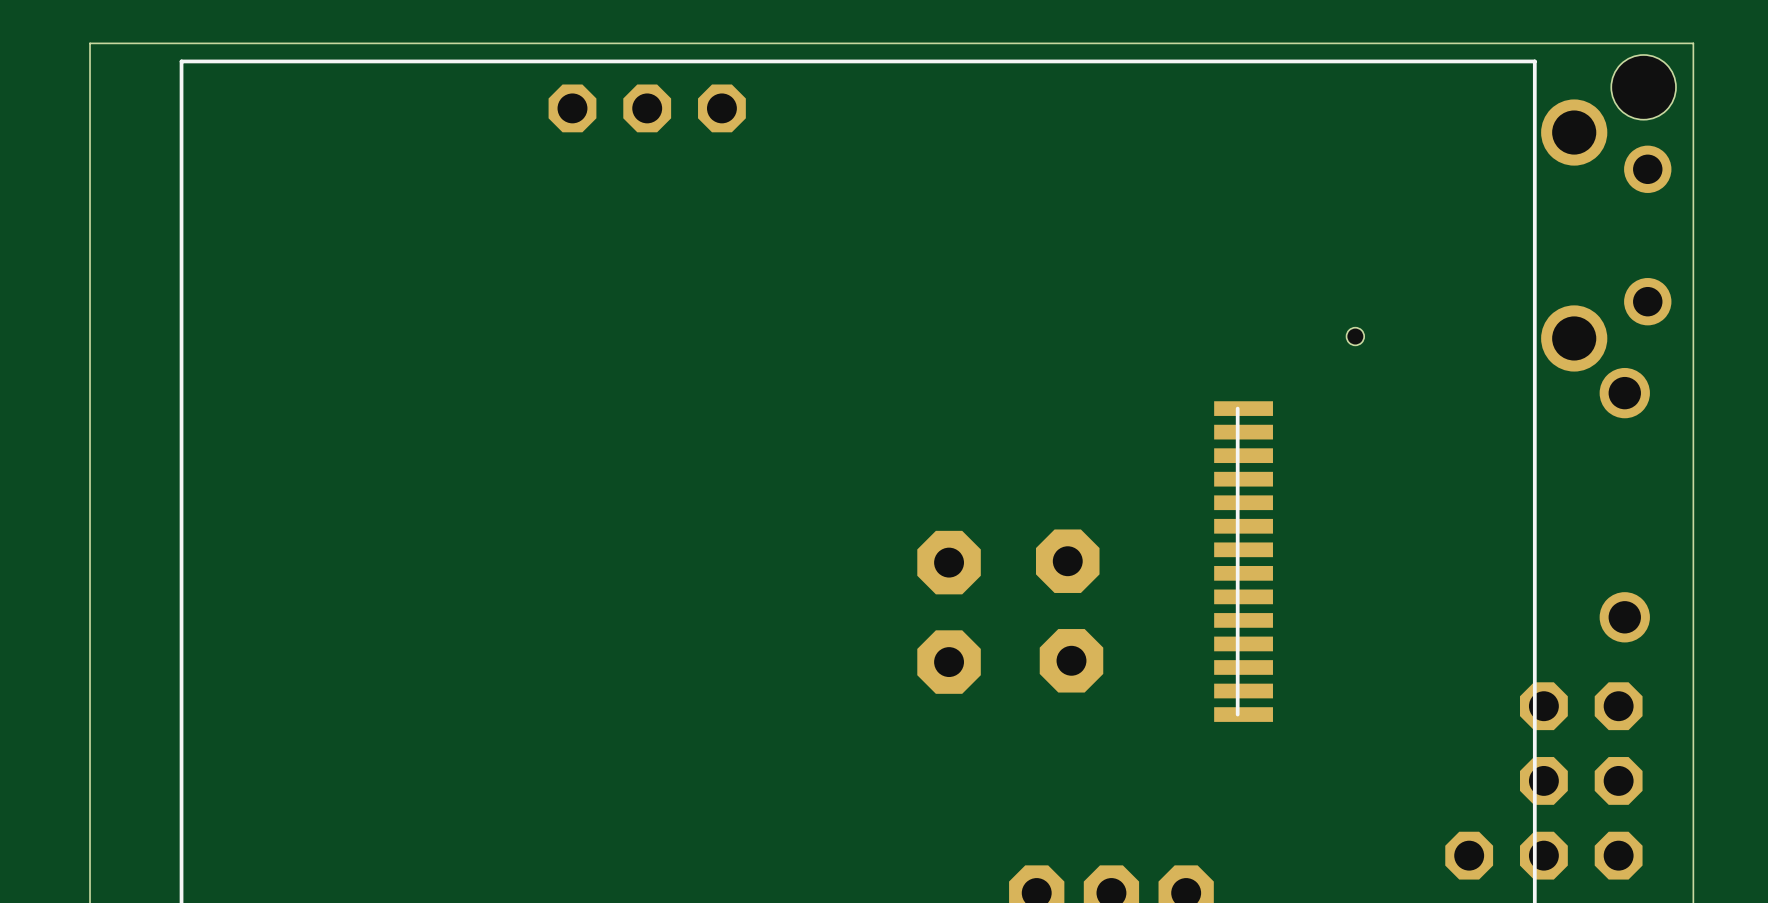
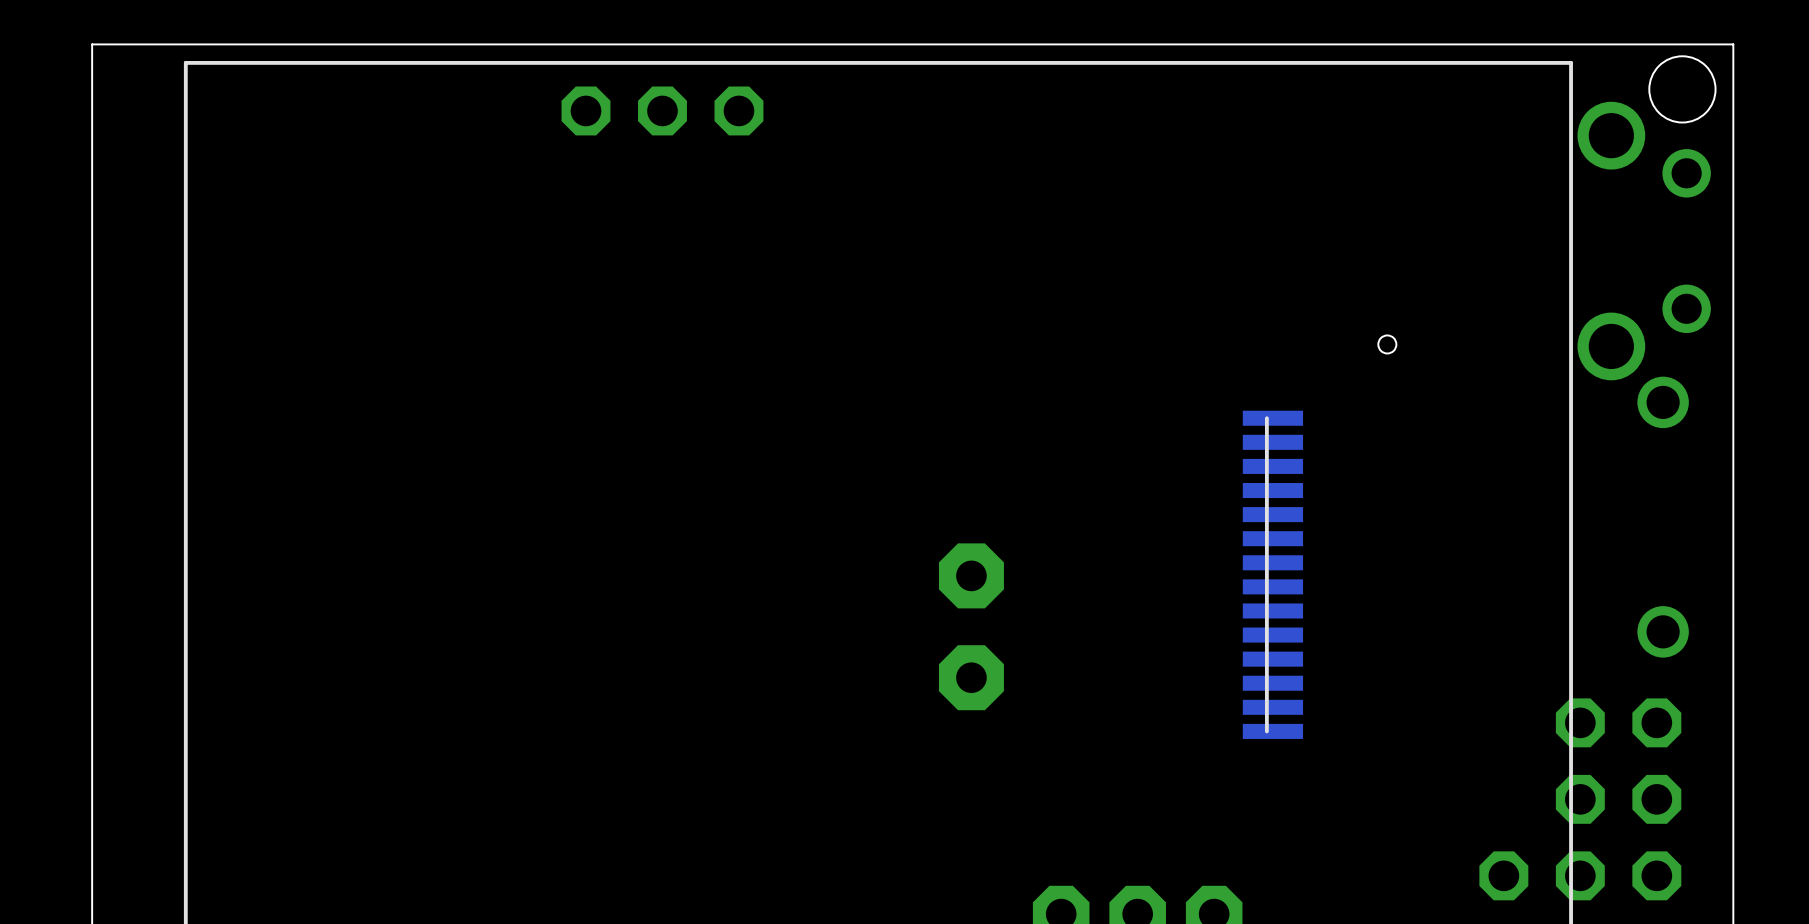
part: (1067, 561) -> none
part: (1071, 660) -> none

